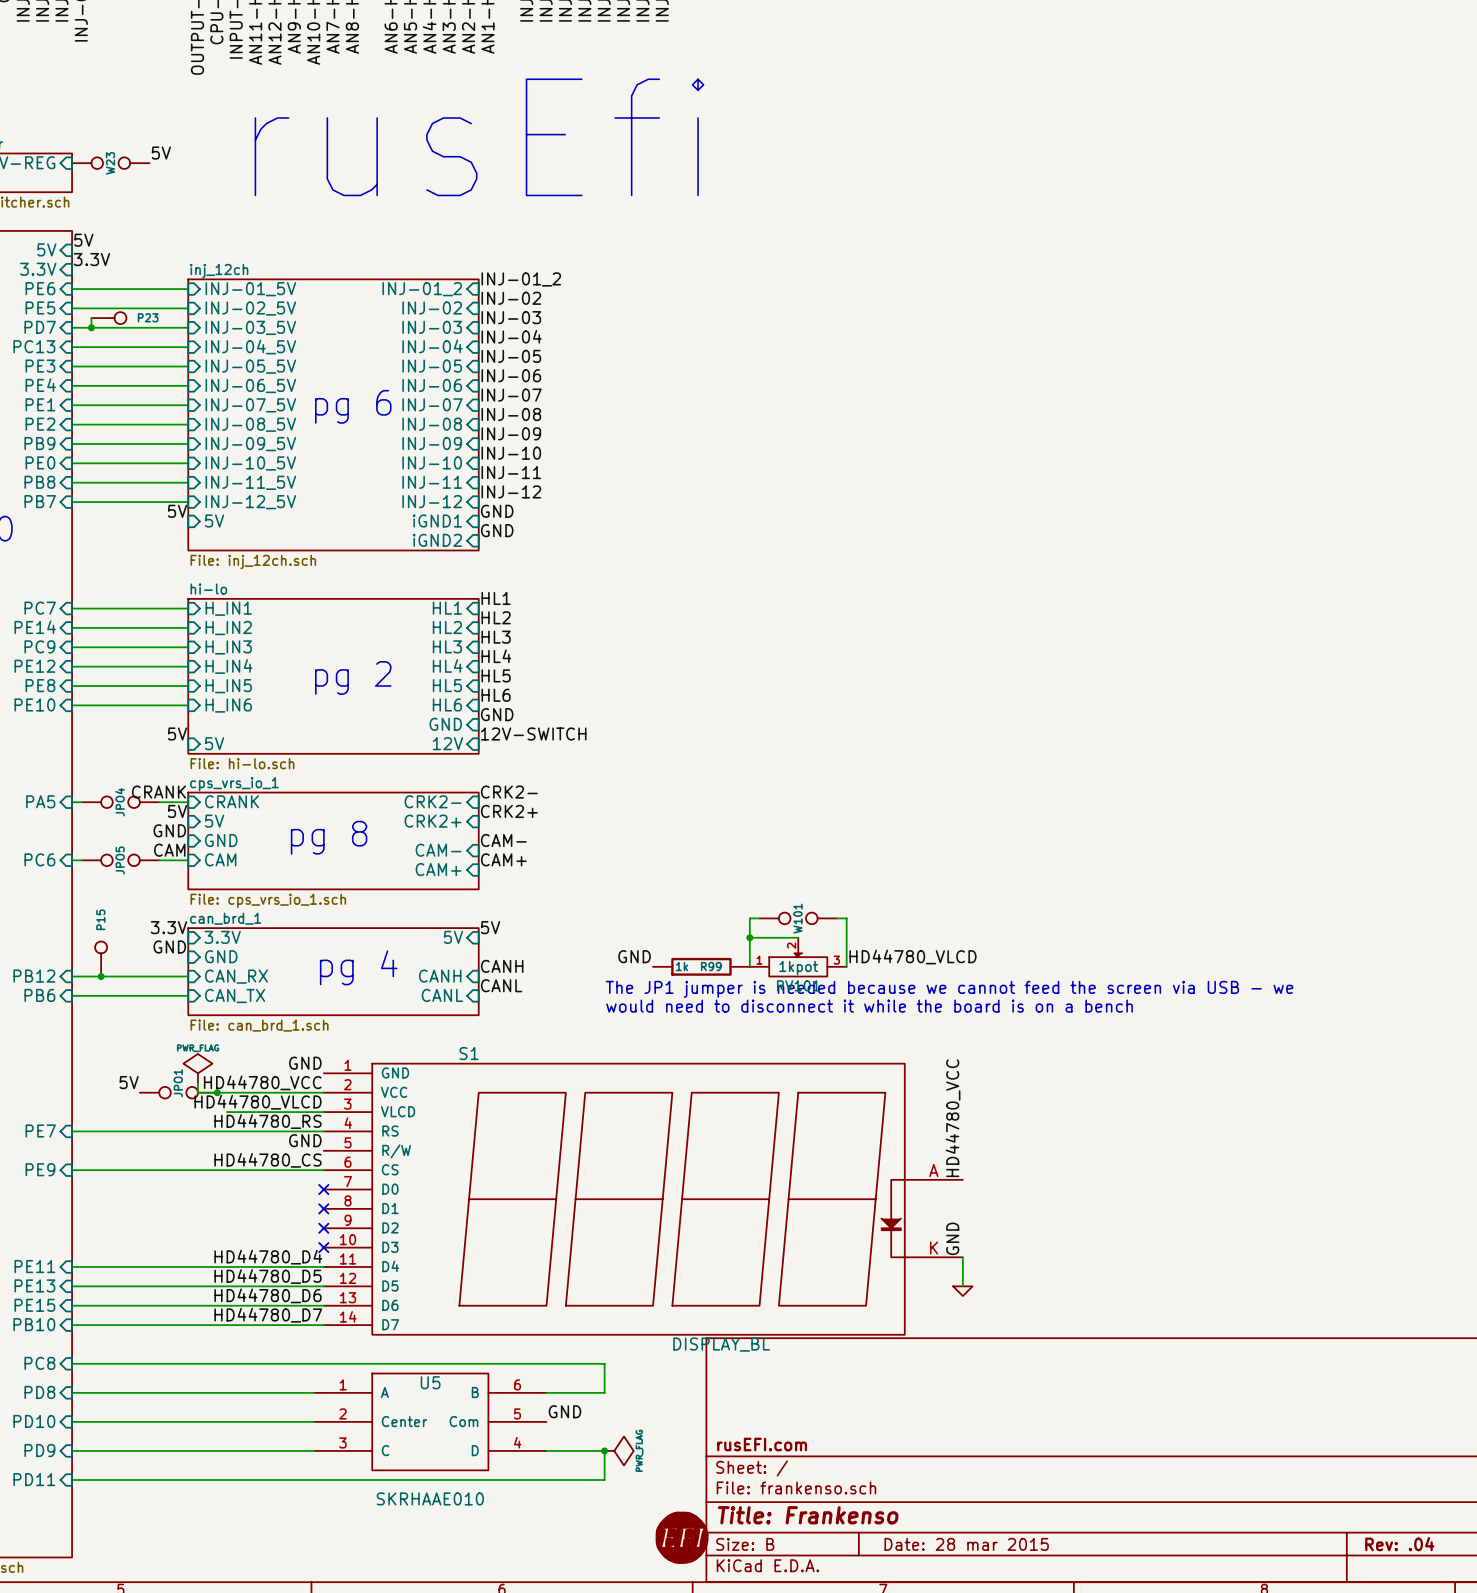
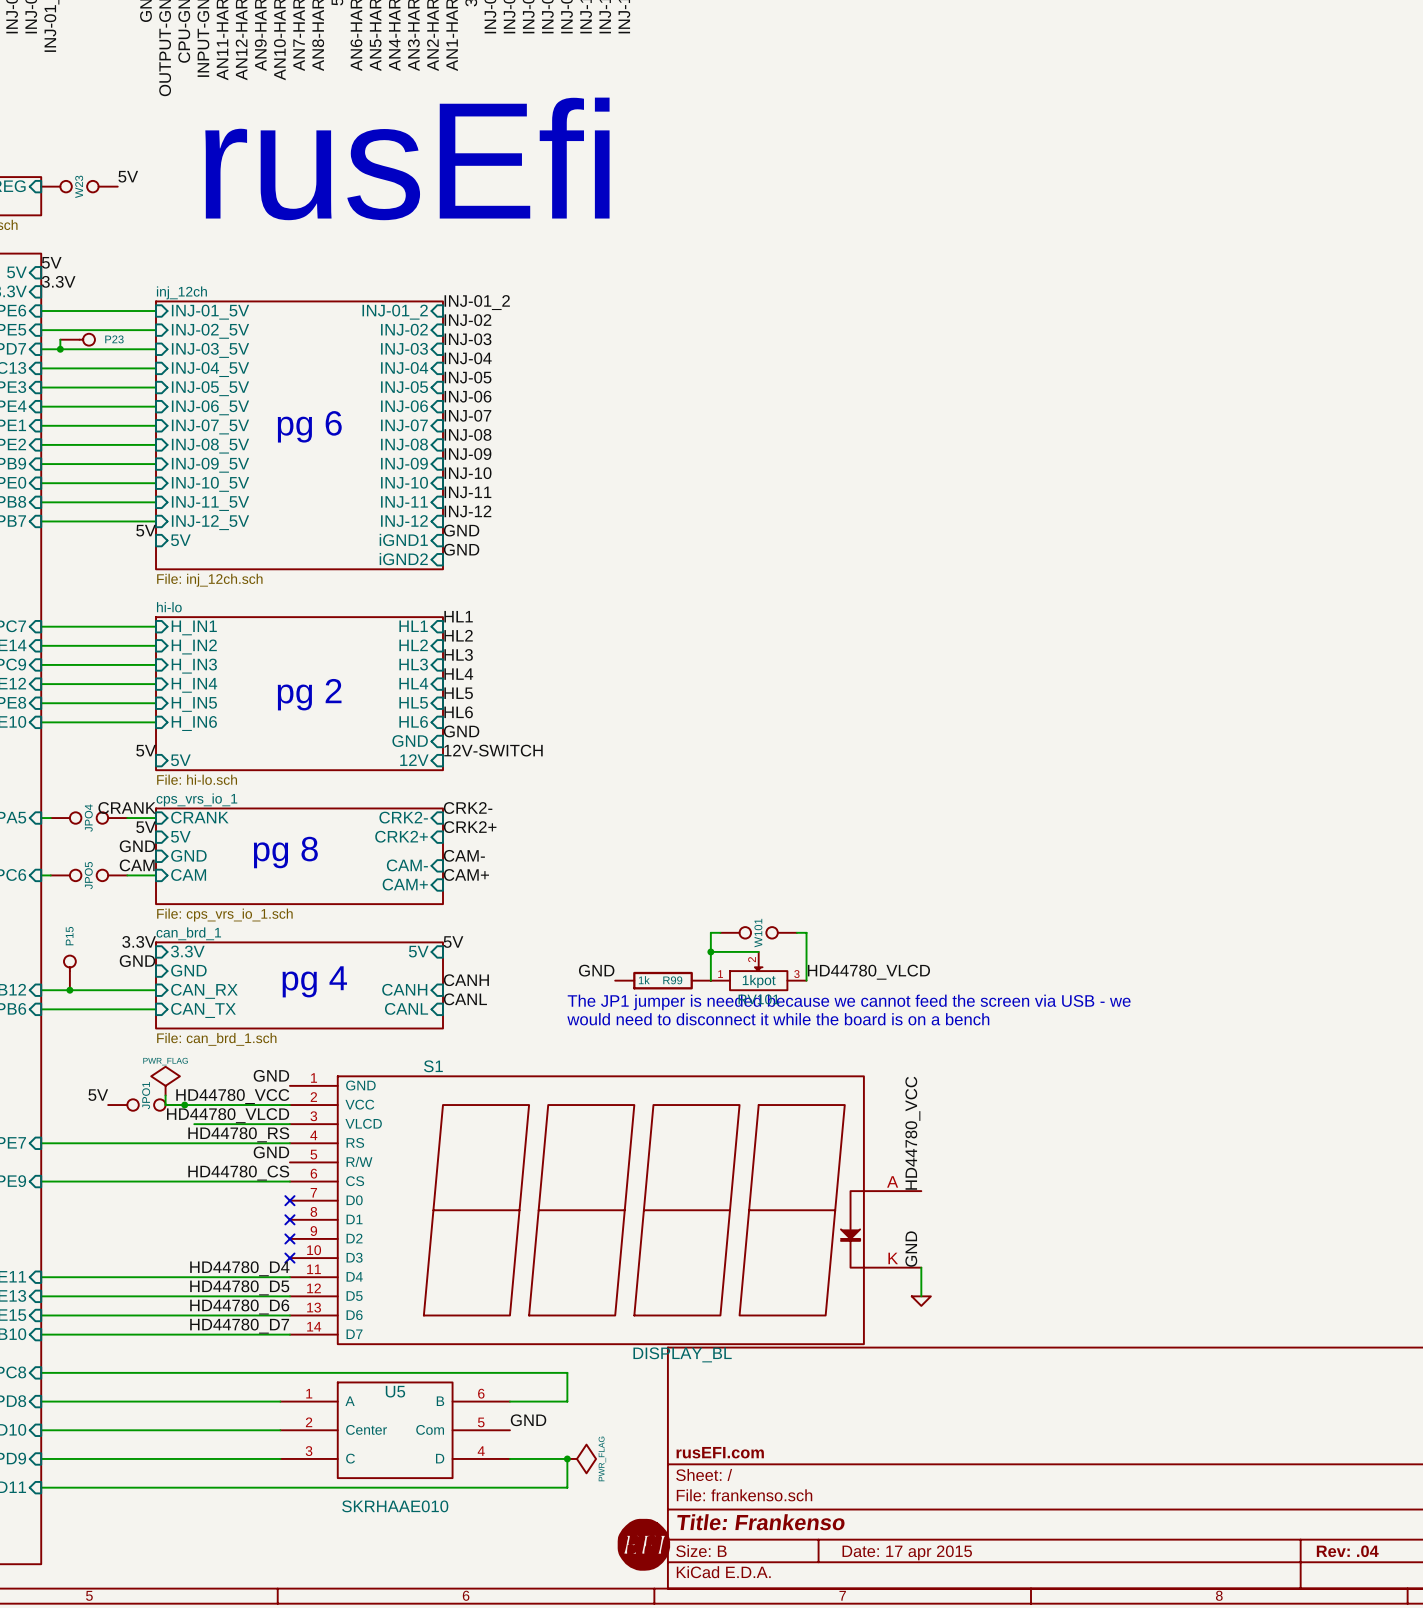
title block: Date: 28 mar 2015 (966, 1544) -> Date: 17 apr 2015 (907, 1552)

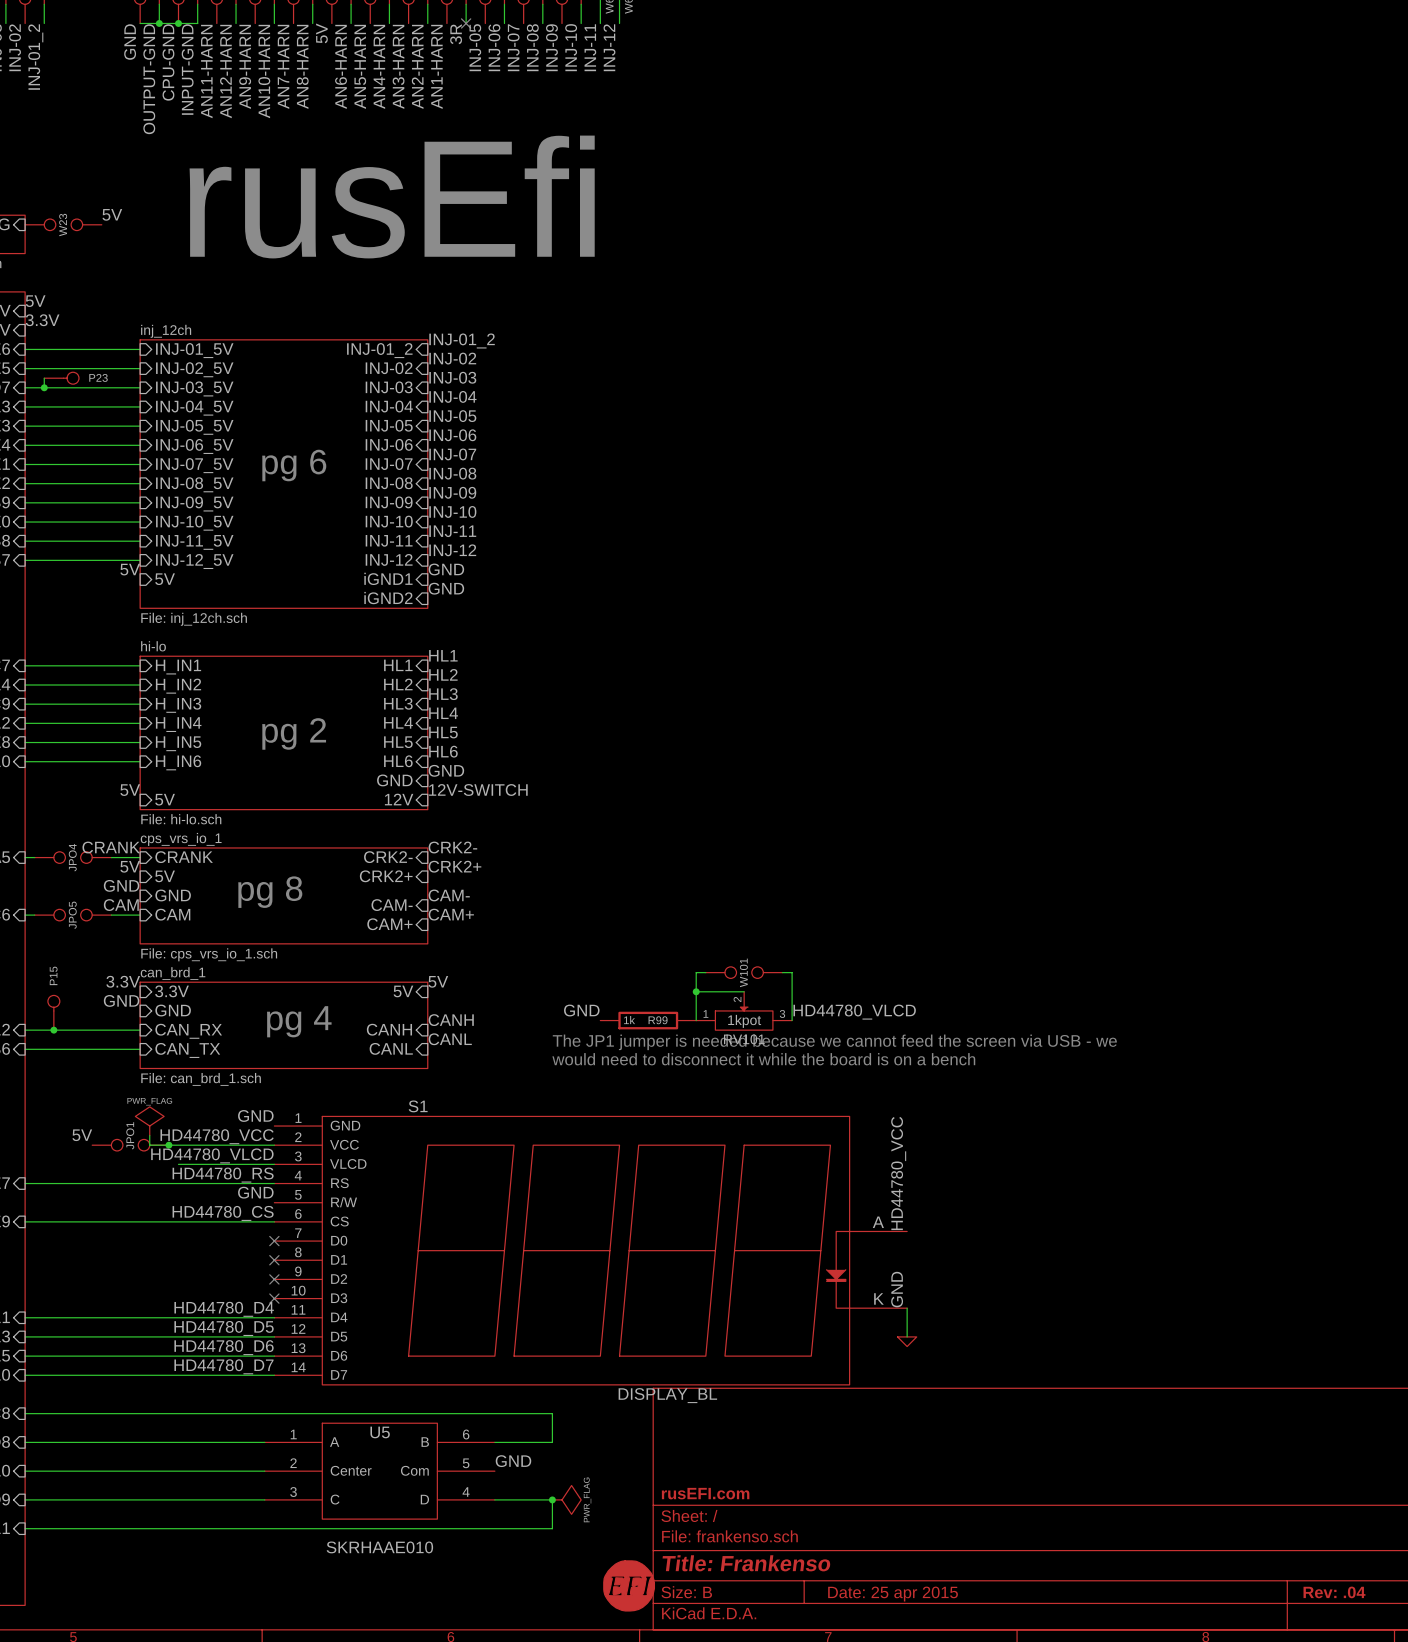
title block: Date: 17 apr 2015 (907, 1552) -> Date: 25 apr 2015 (893, 1594)

